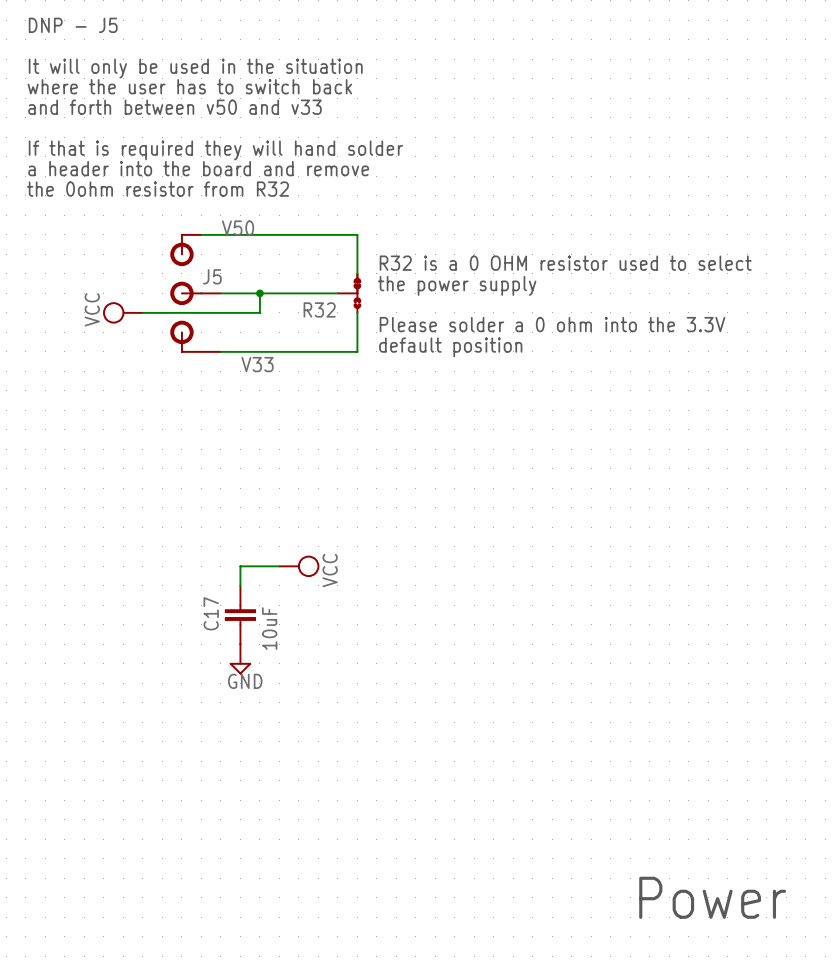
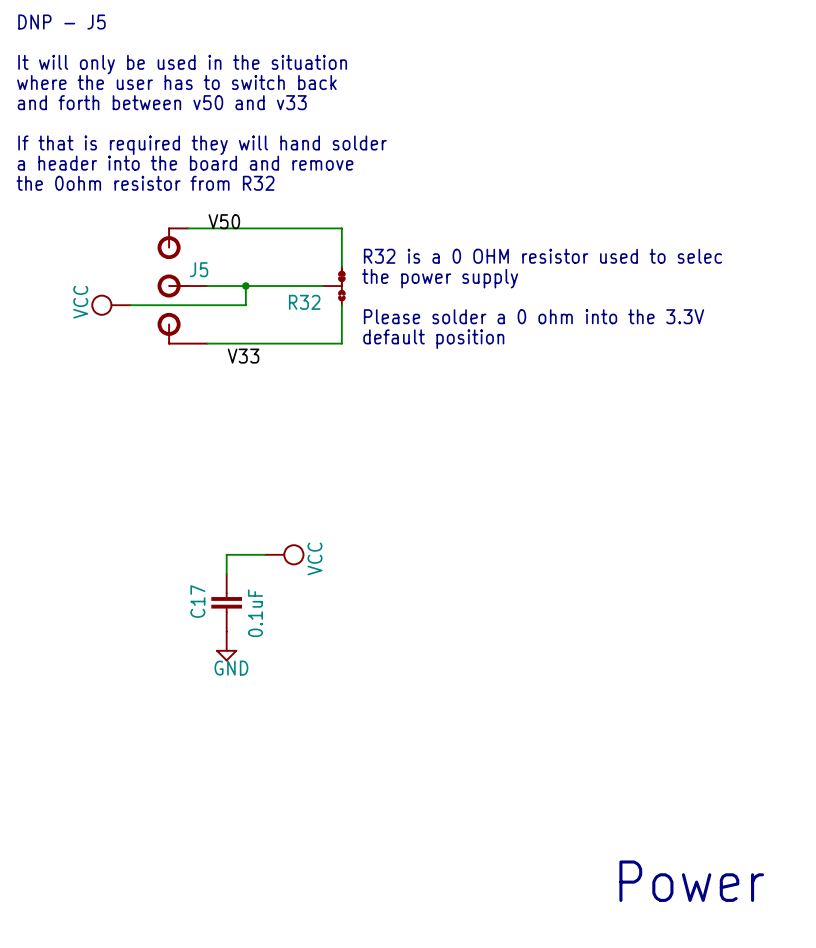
text: R32 is a 0 OHM resistor used to select (565, 263) -> R32 is a 0 OHM resistor used to selec (542, 256)
C17 value: 10uF (269, 628) -> 0.1uF (255, 613)

